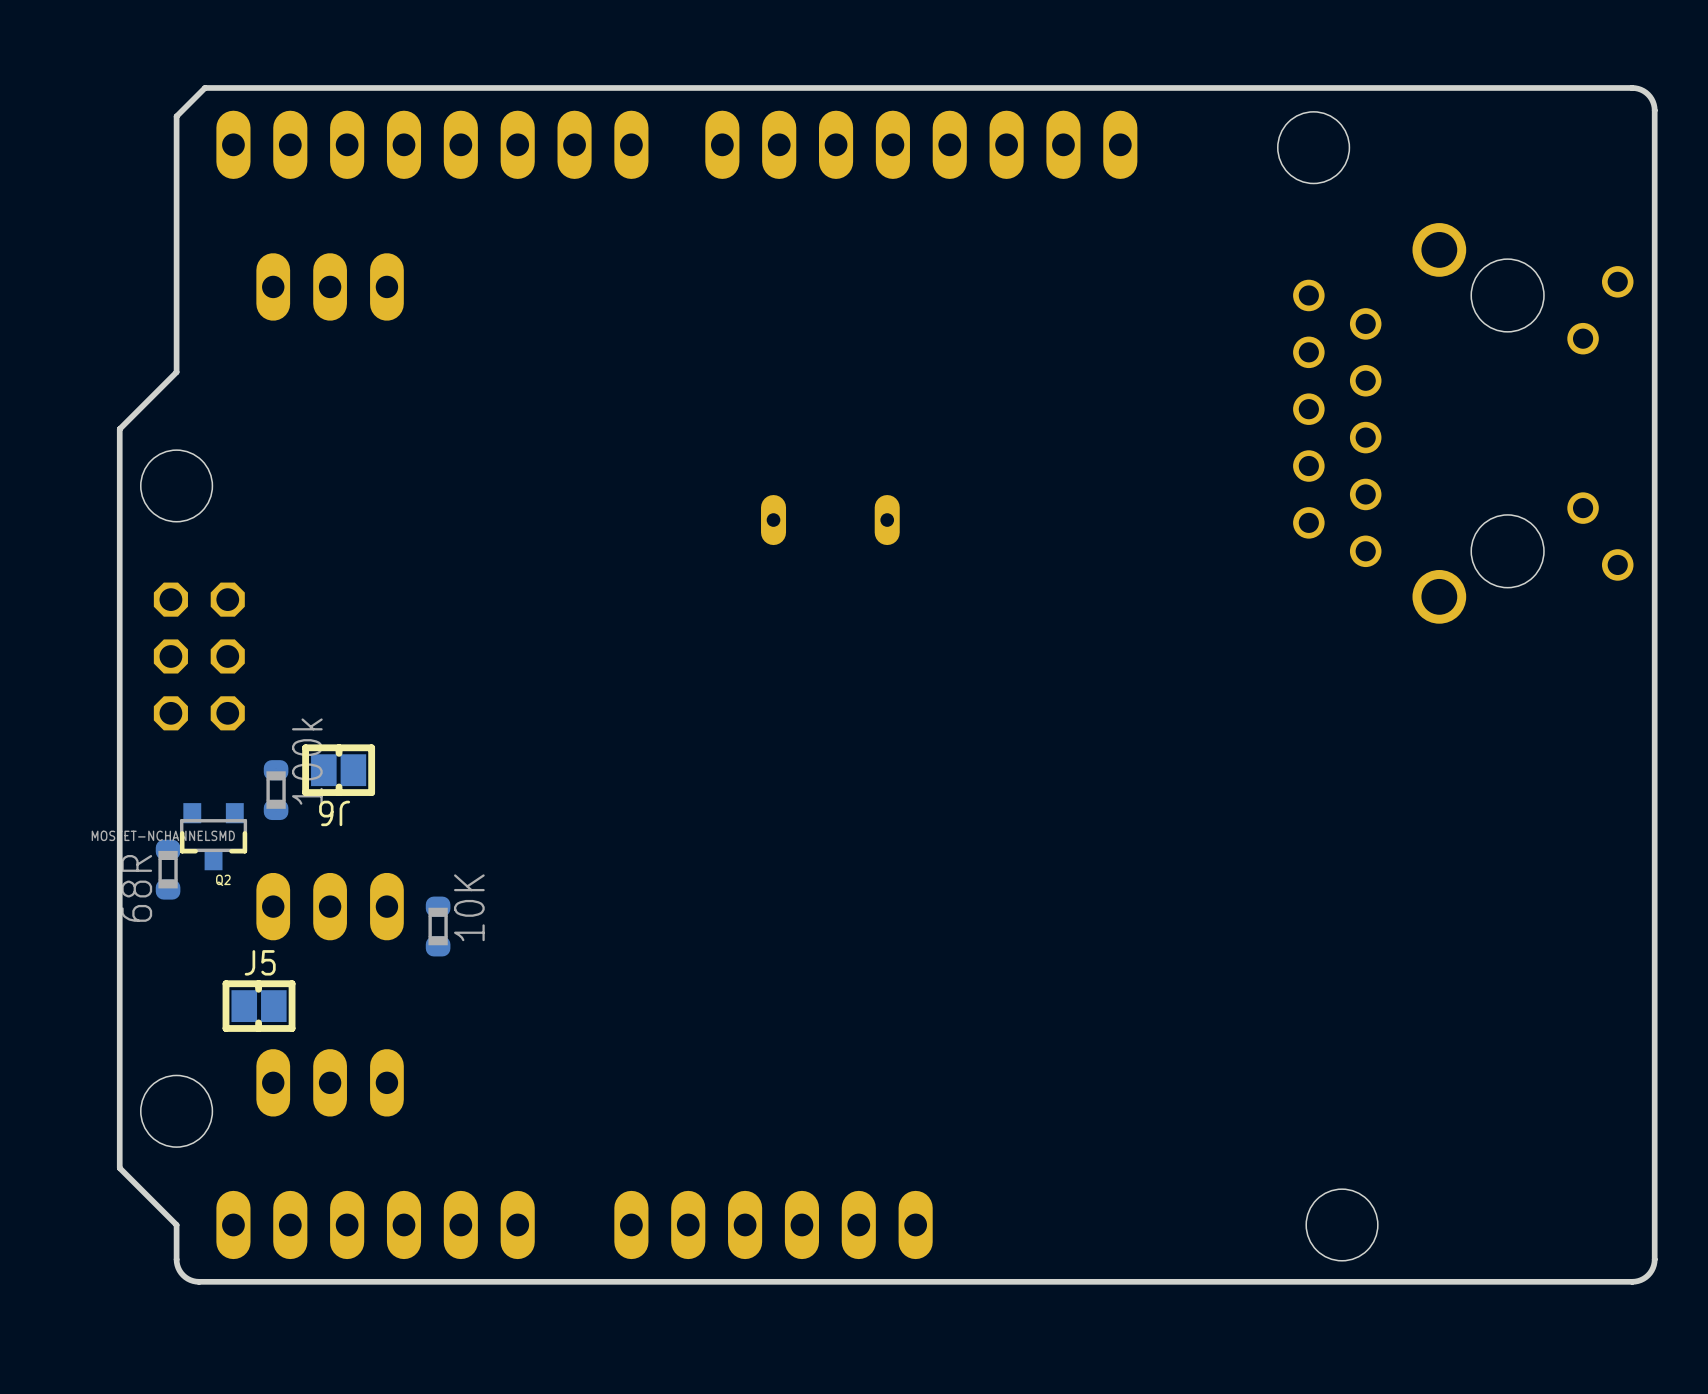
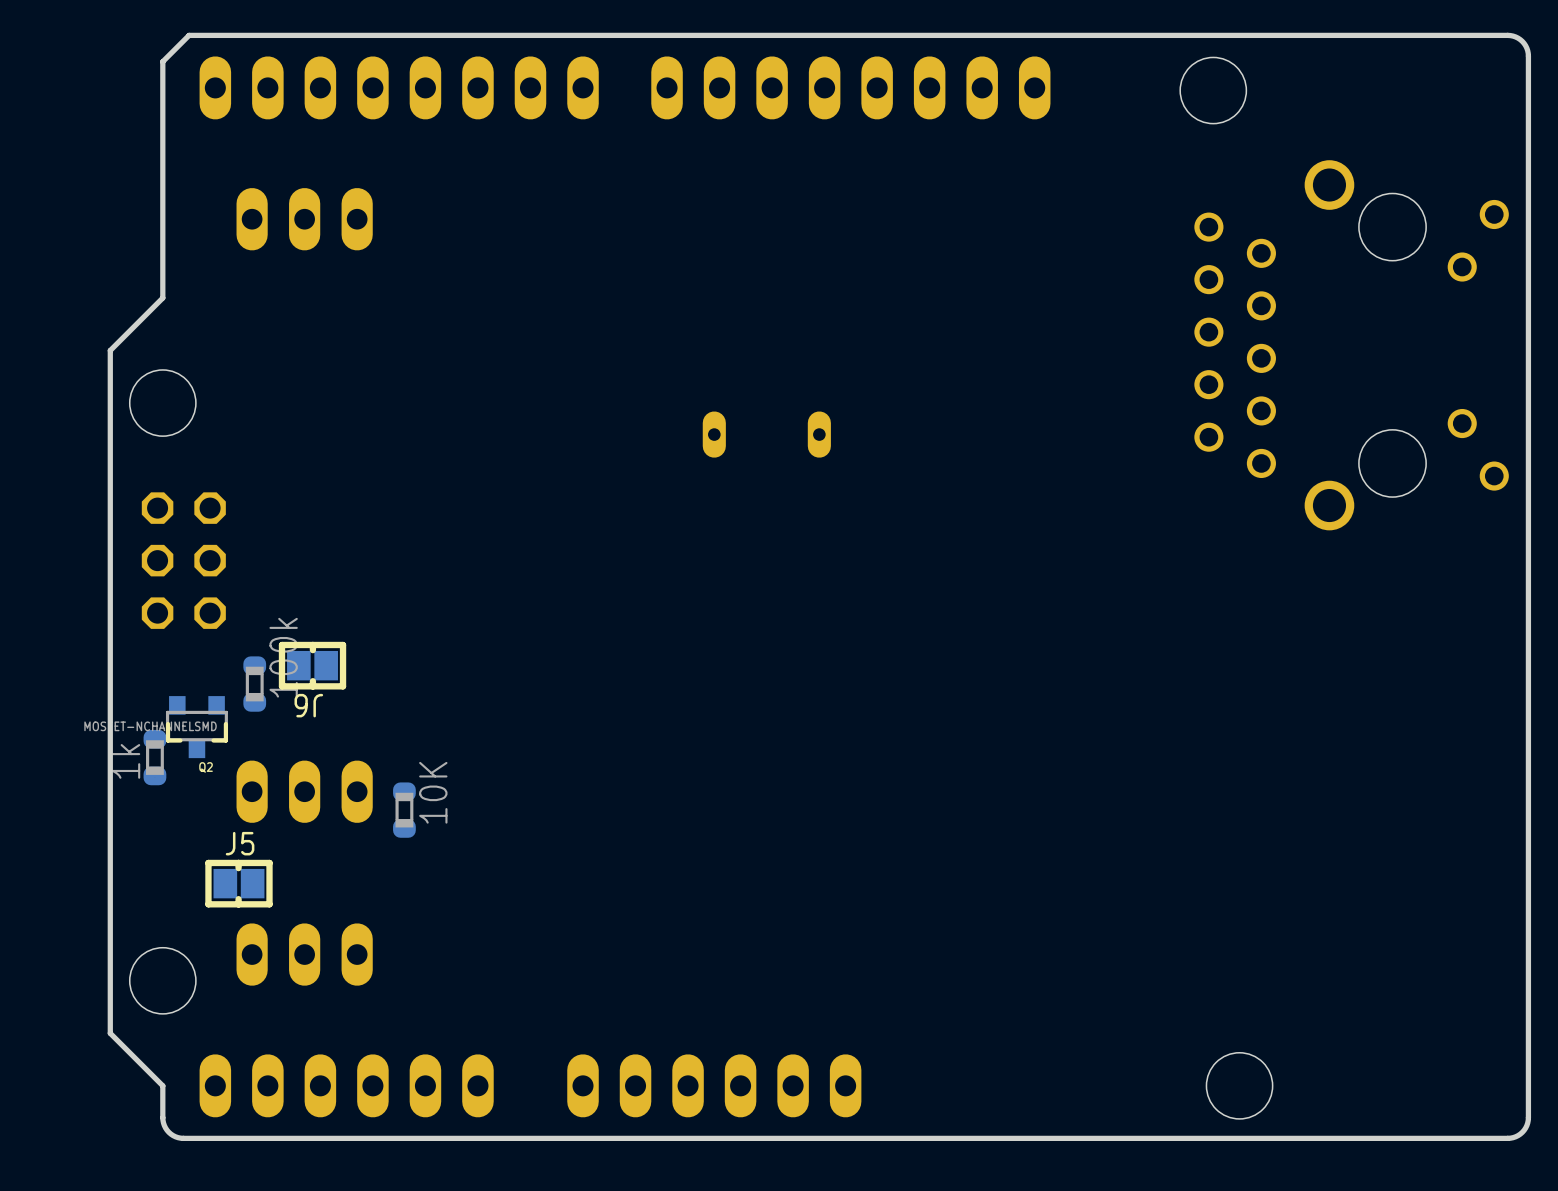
part value: 68R (136, 888) -> 1k (126, 761)

